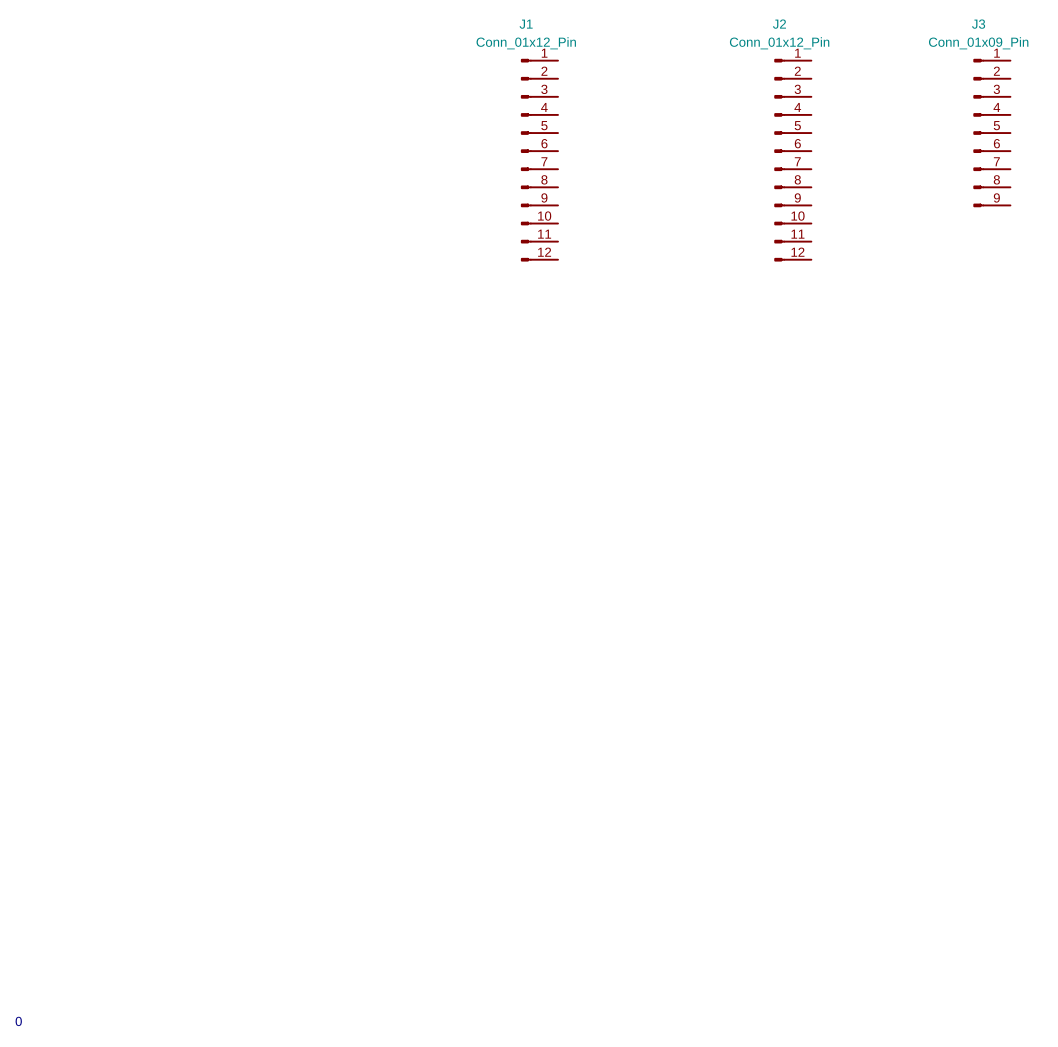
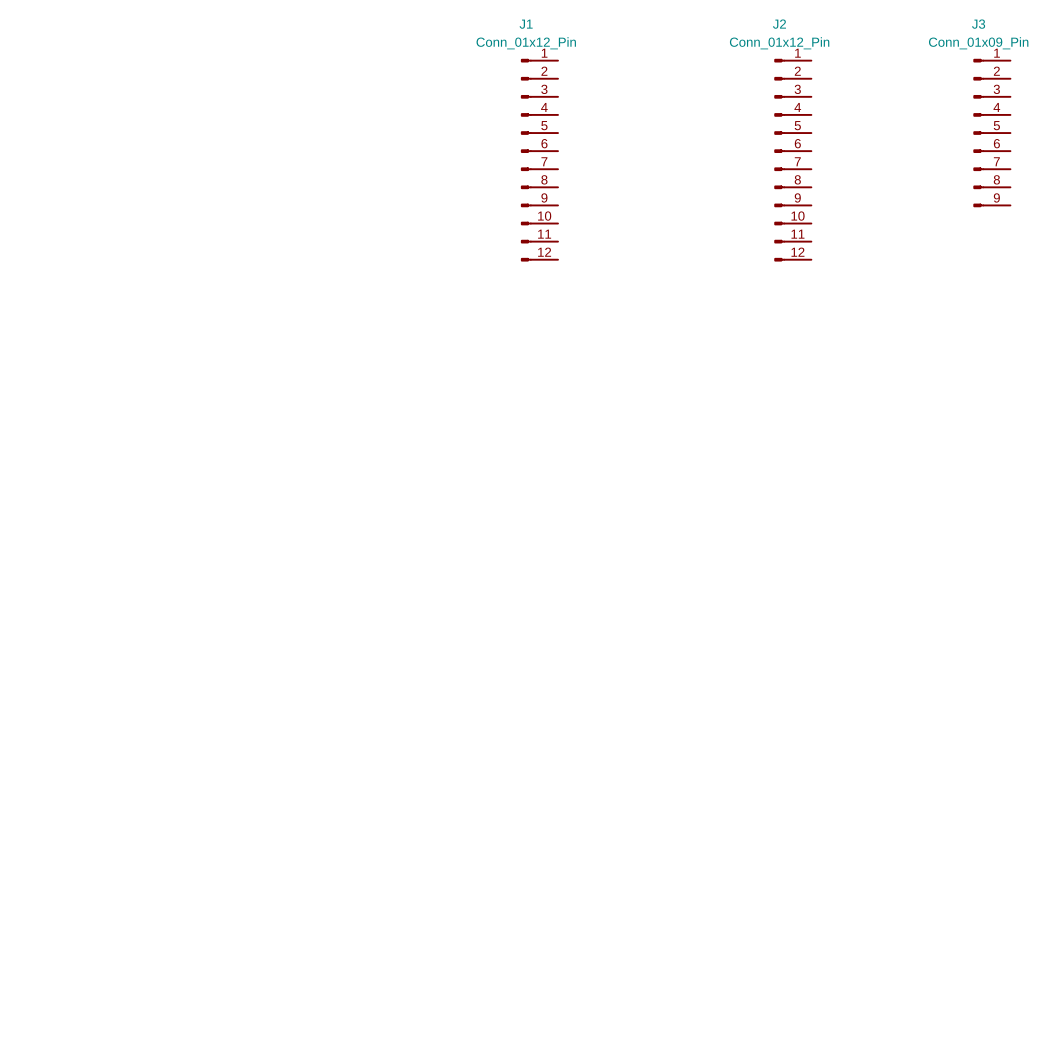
text: 0 (18, 1021) -> none

